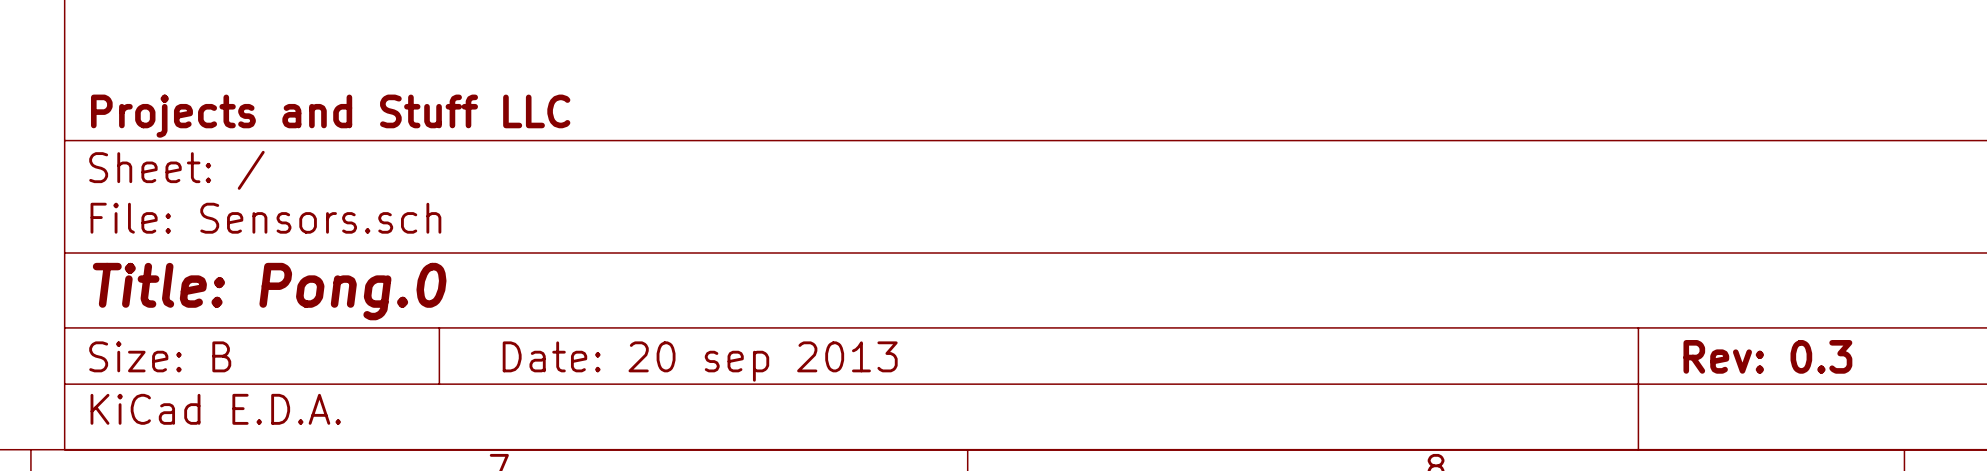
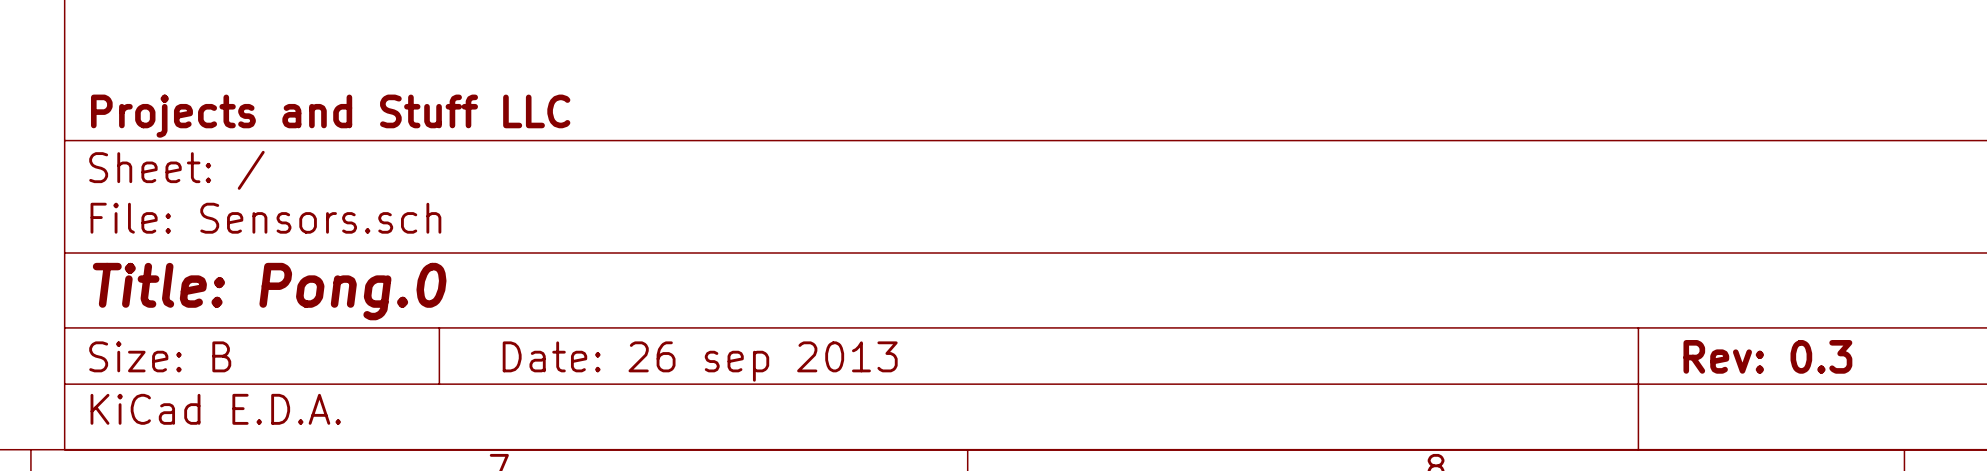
title block: Date: 20 sep 2013 (700, 361) -> Date: 26 sep 2013 (700, 361)

